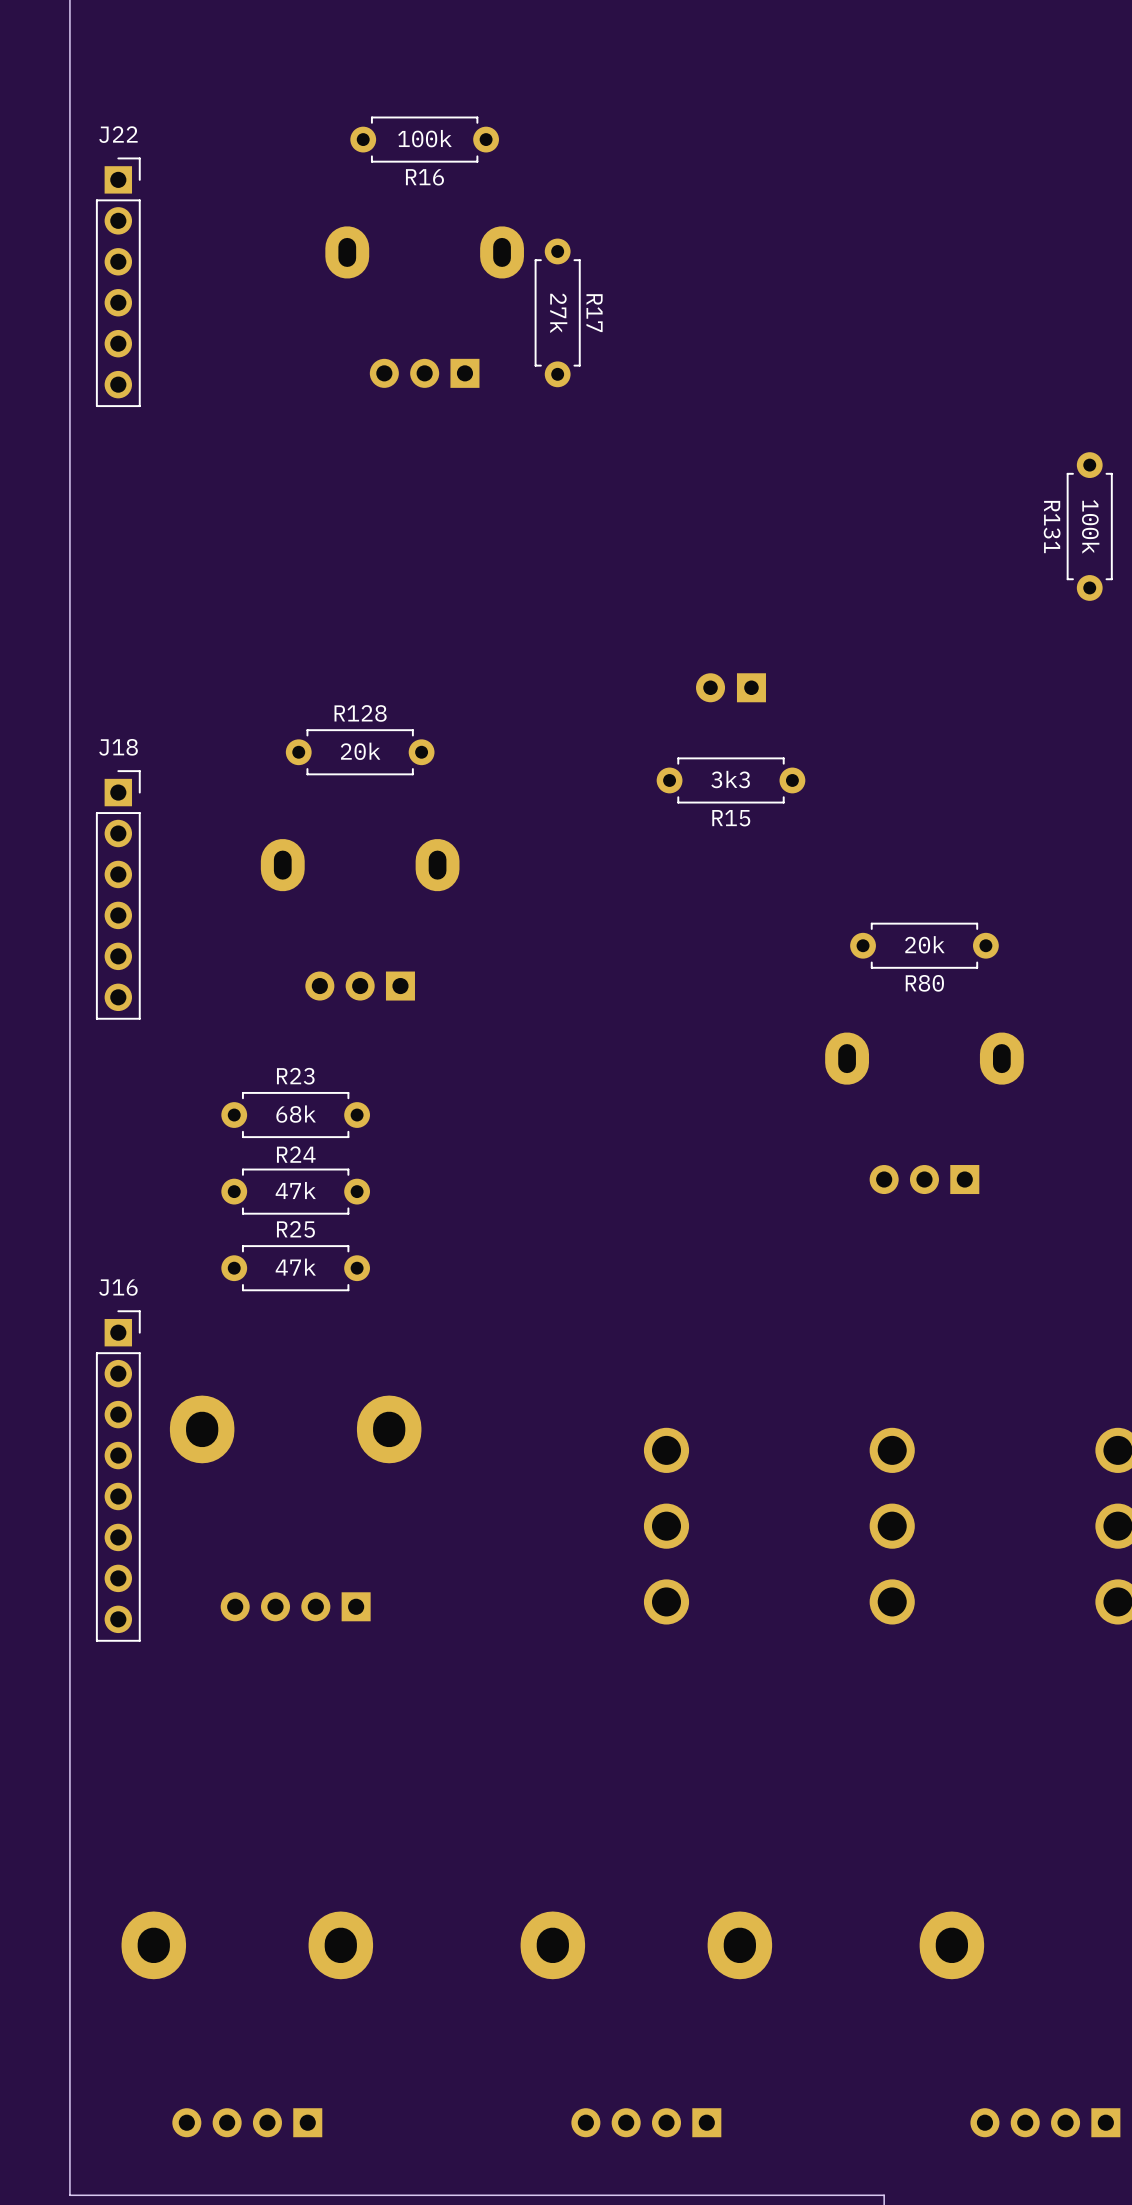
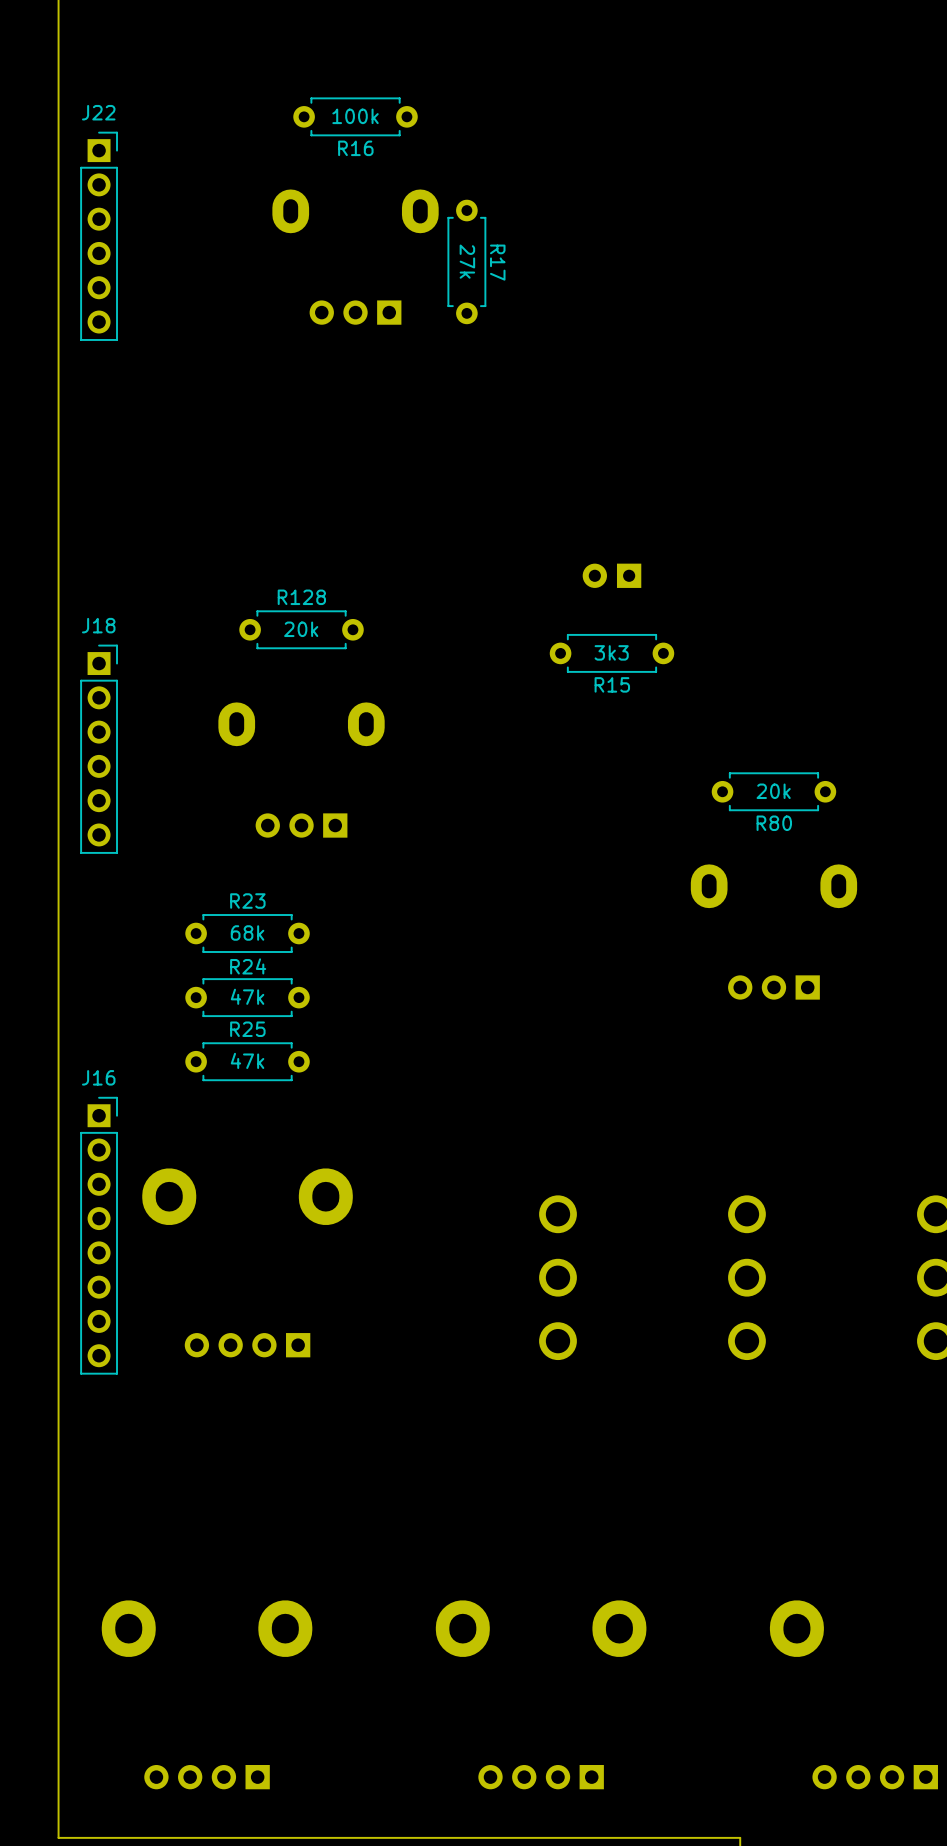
R131: 100k (1089, 526) -> none

